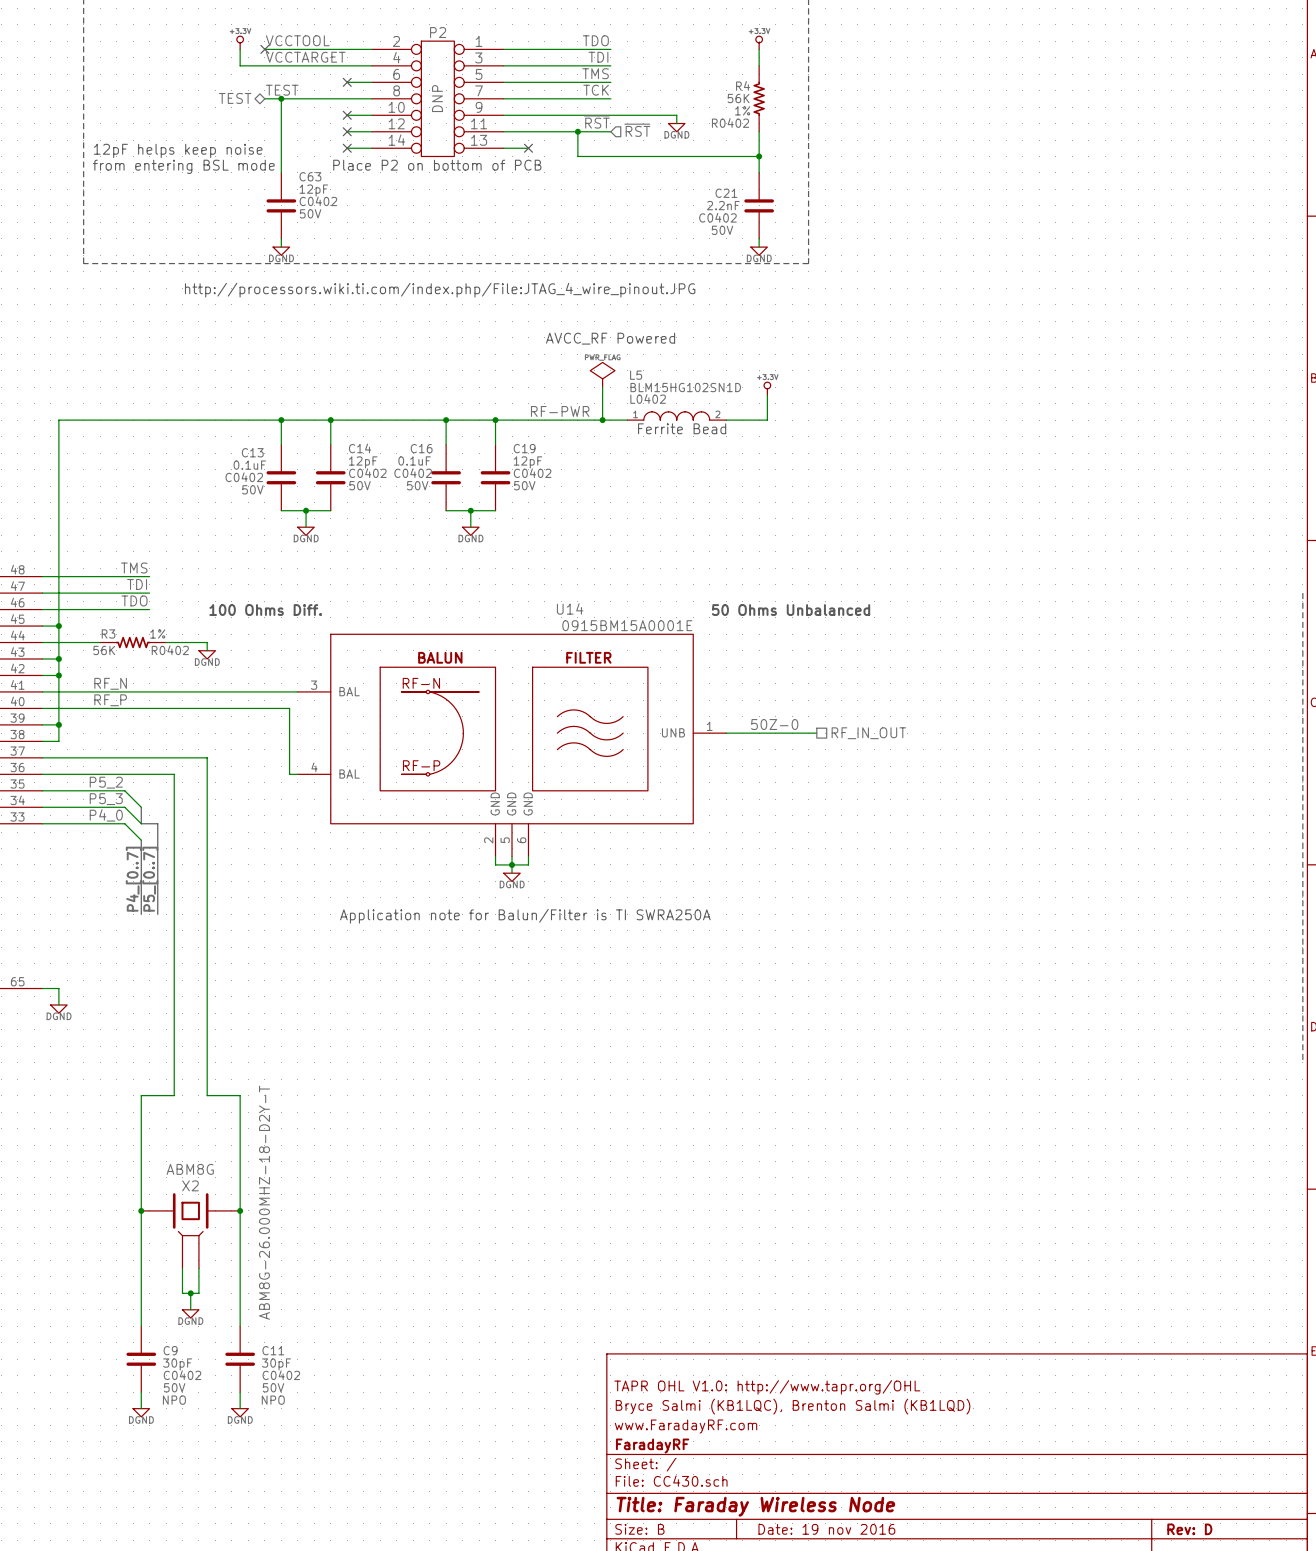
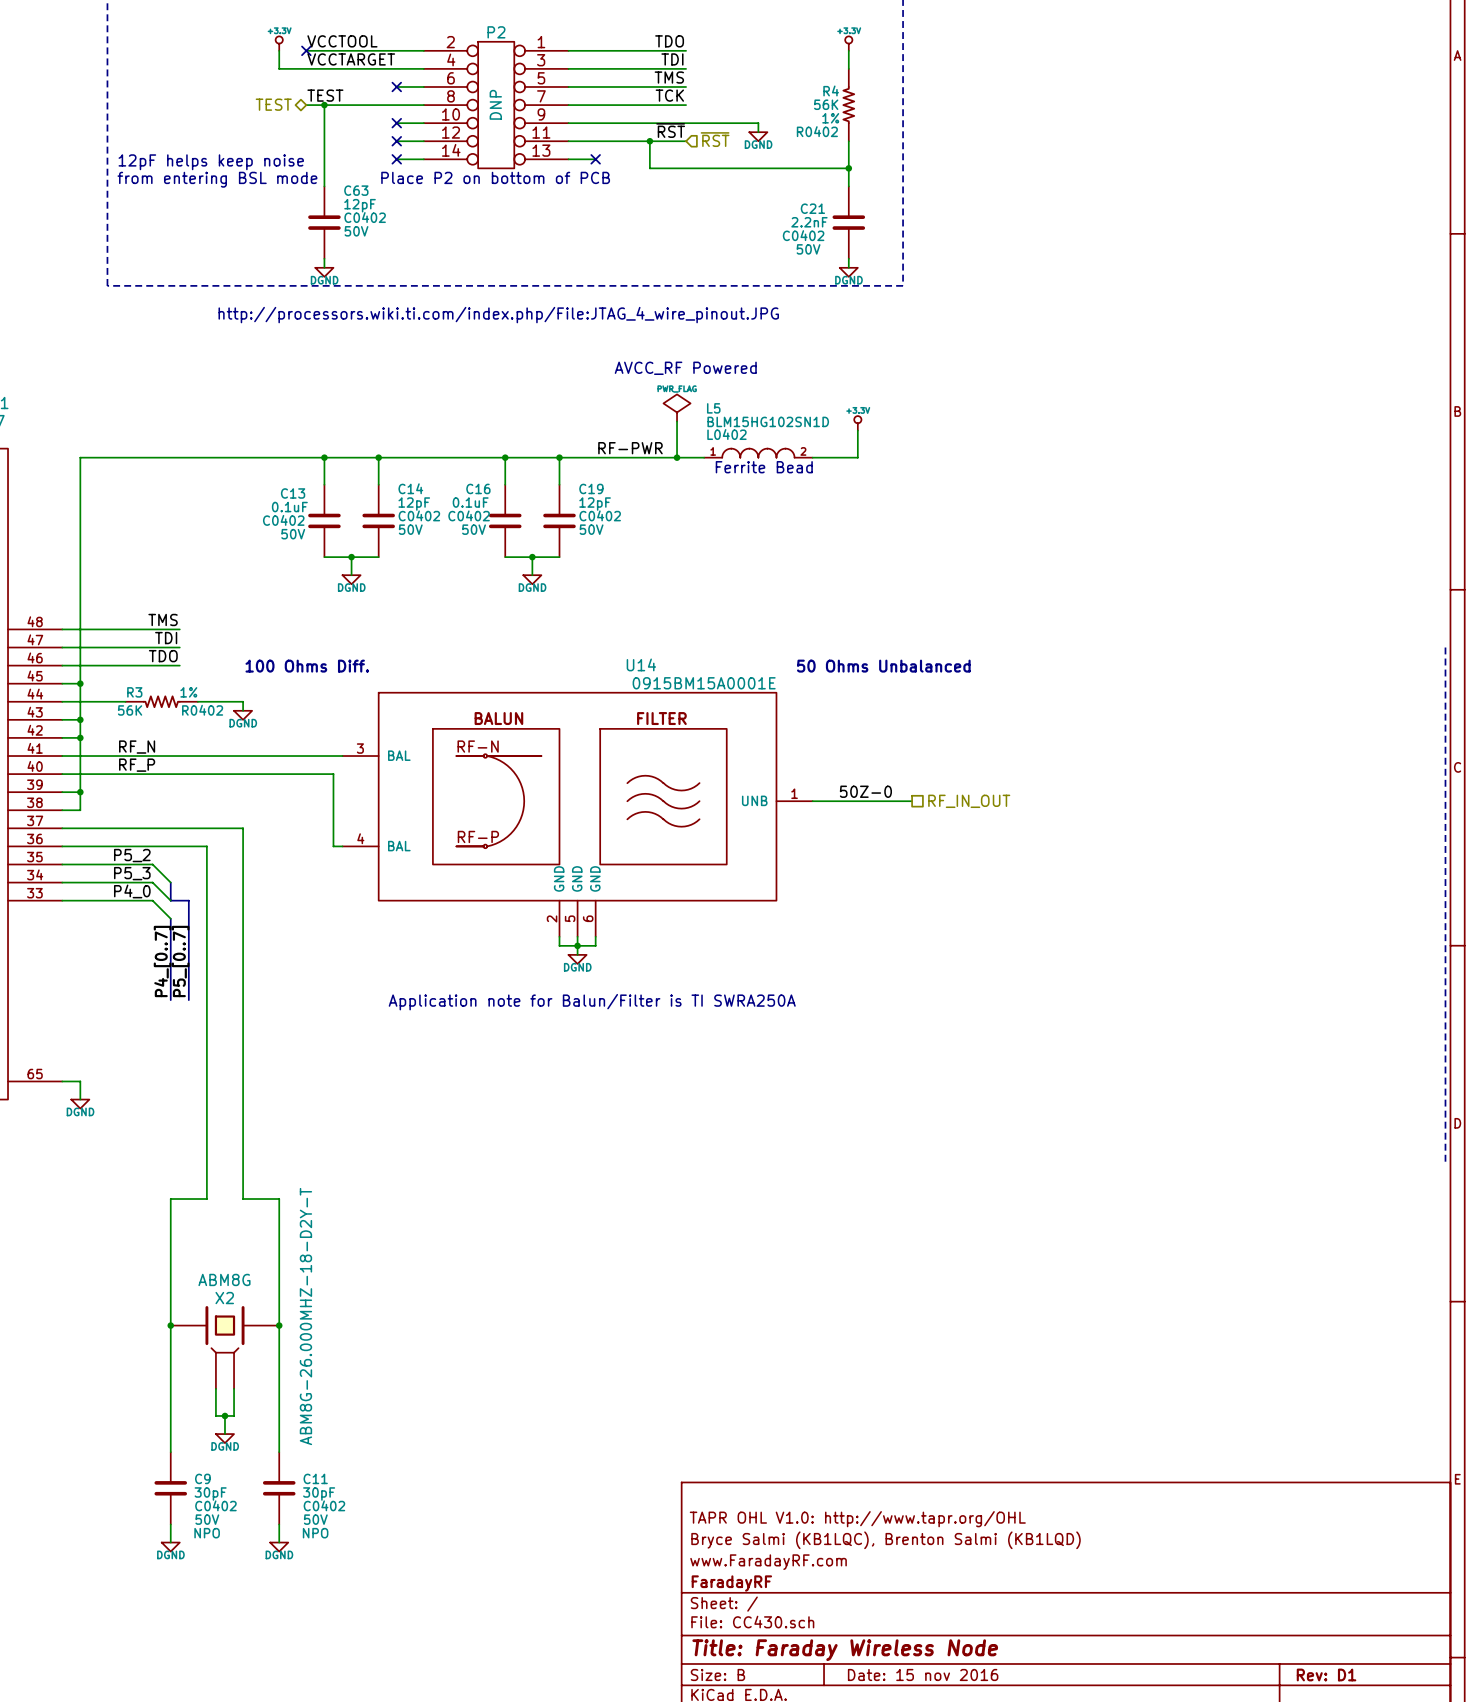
title block: Date: 19 nov 2016 (826, 1529) -> Date: 15 nov 2016 (923, 1674)
title block: Rev: D (1189, 1529) -> Rev: D1 (1326, 1674)

